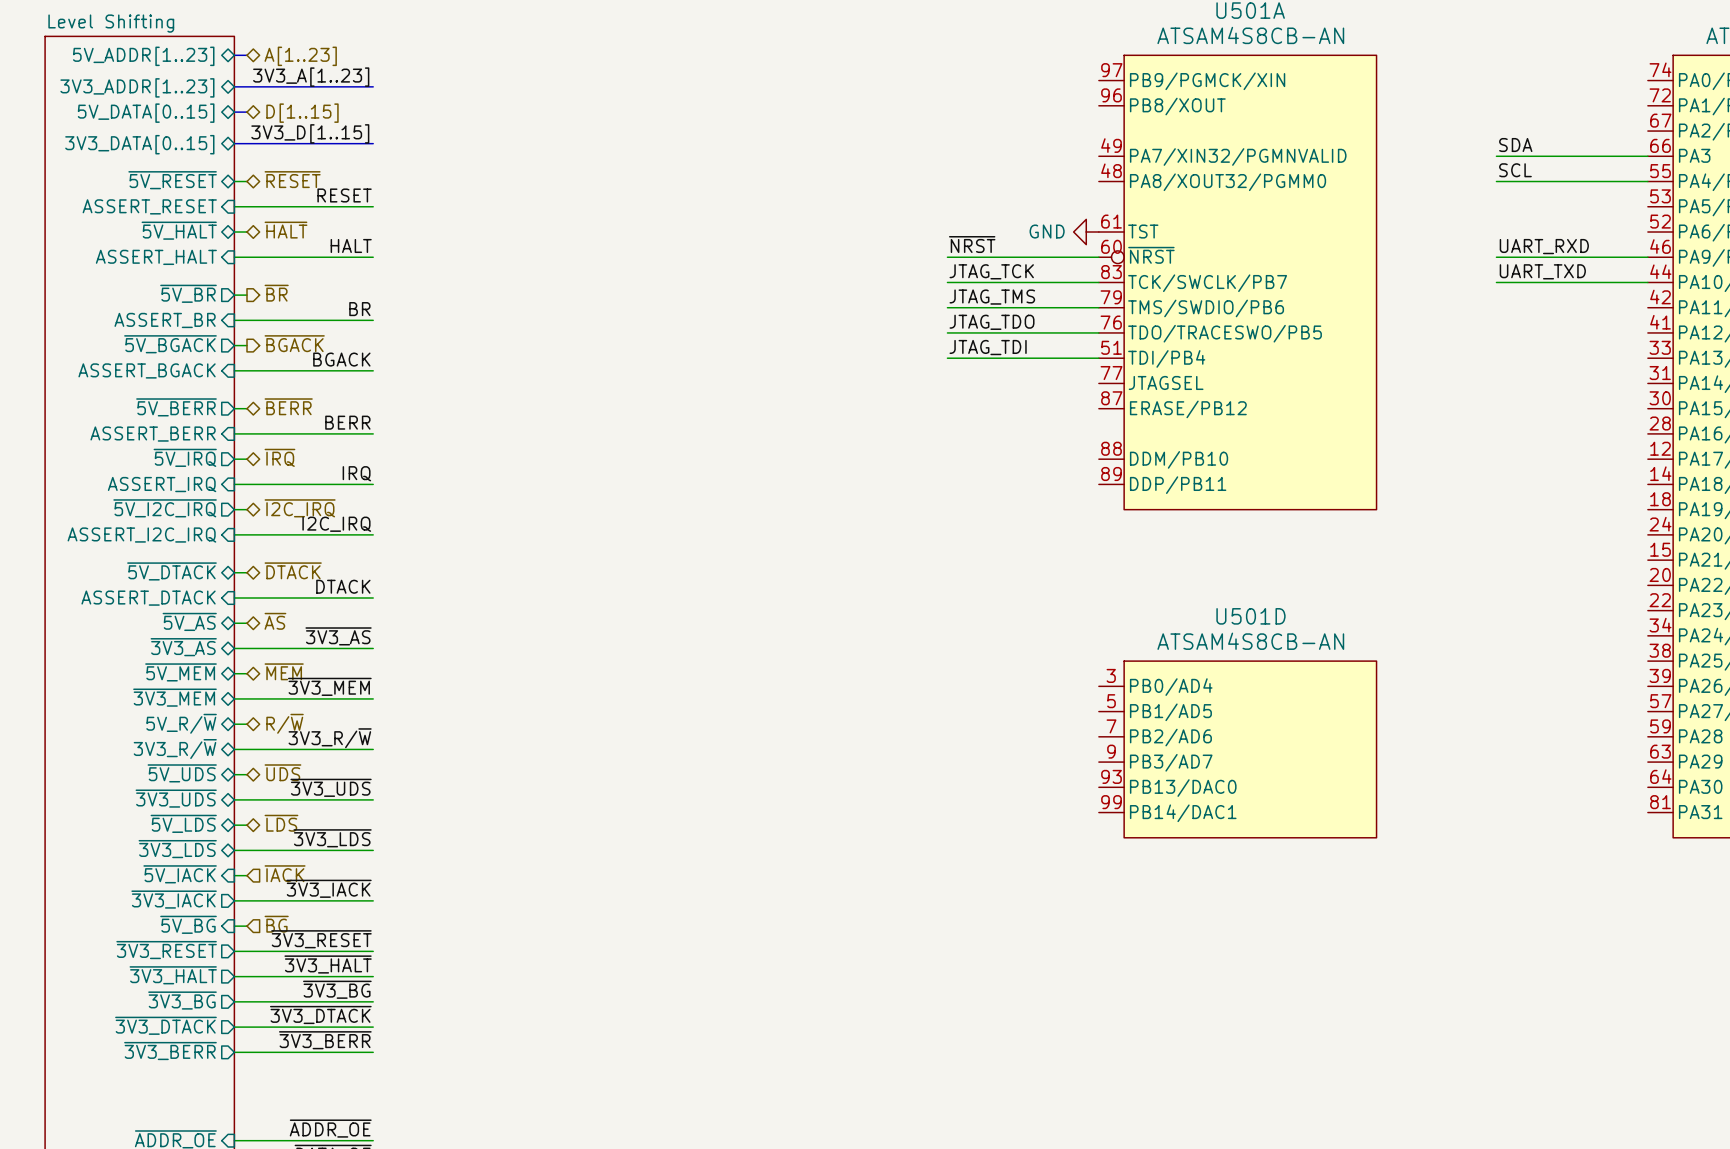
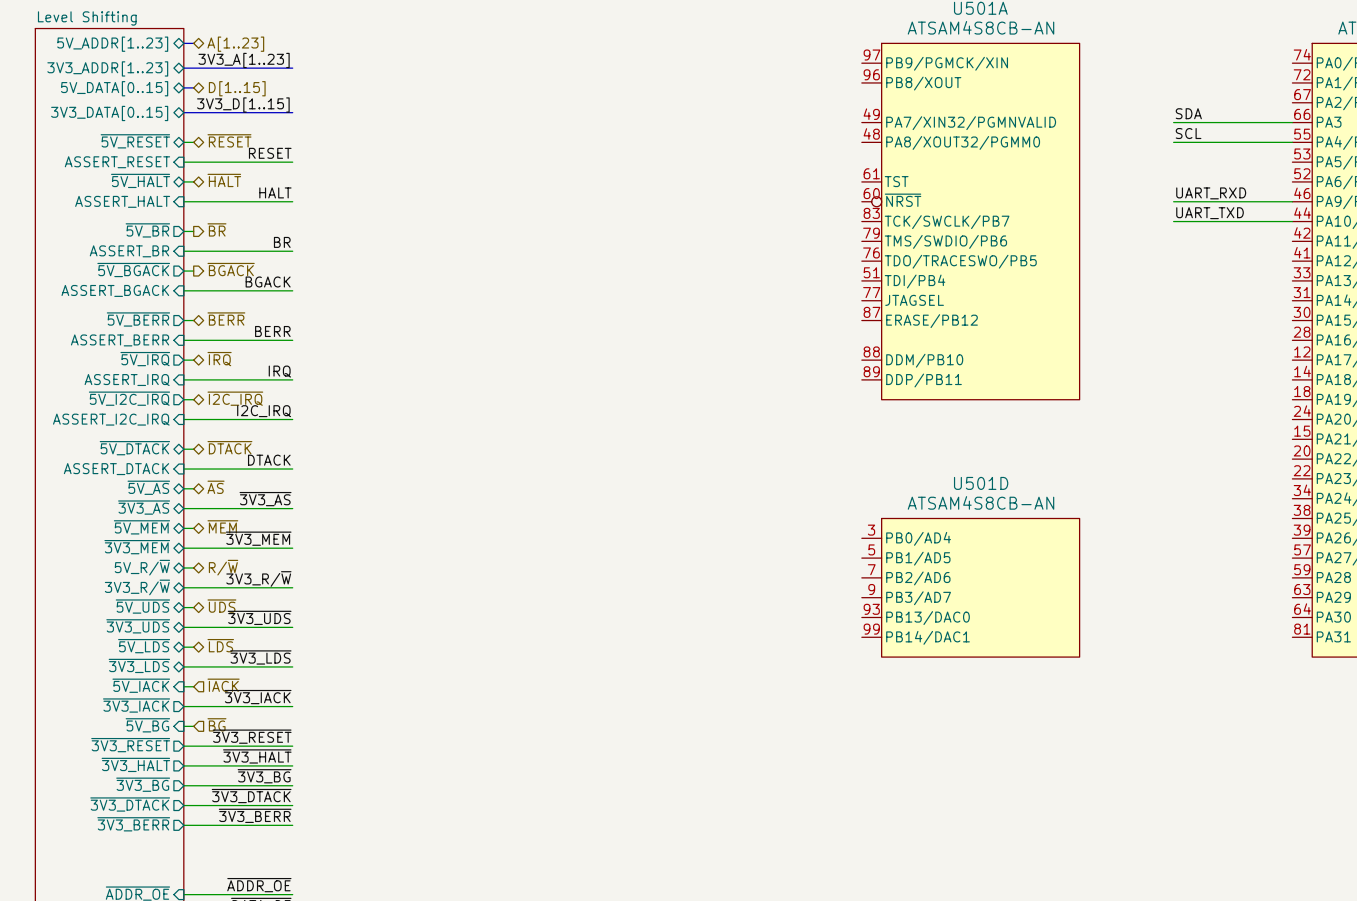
power symbol: GND (1086, 232) -> none
label: ~{NRST} (972, 244) -> none
wire: (947, 257) (1098, 257) -> none
label: JTAG_TCK (991, 271) -> none
wire: (947, 282) (1098, 282) -> none
label: JTAG_TMS (992, 297) -> none
wire: (947, 307) (1098, 307) -> none
label: JTAG_TDO (992, 322) -> none
wire: (947, 332) (1098, 332) -> none
label: JTAG_TDI (988, 347) -> none
wire: (947, 358) (1098, 358) -> none

